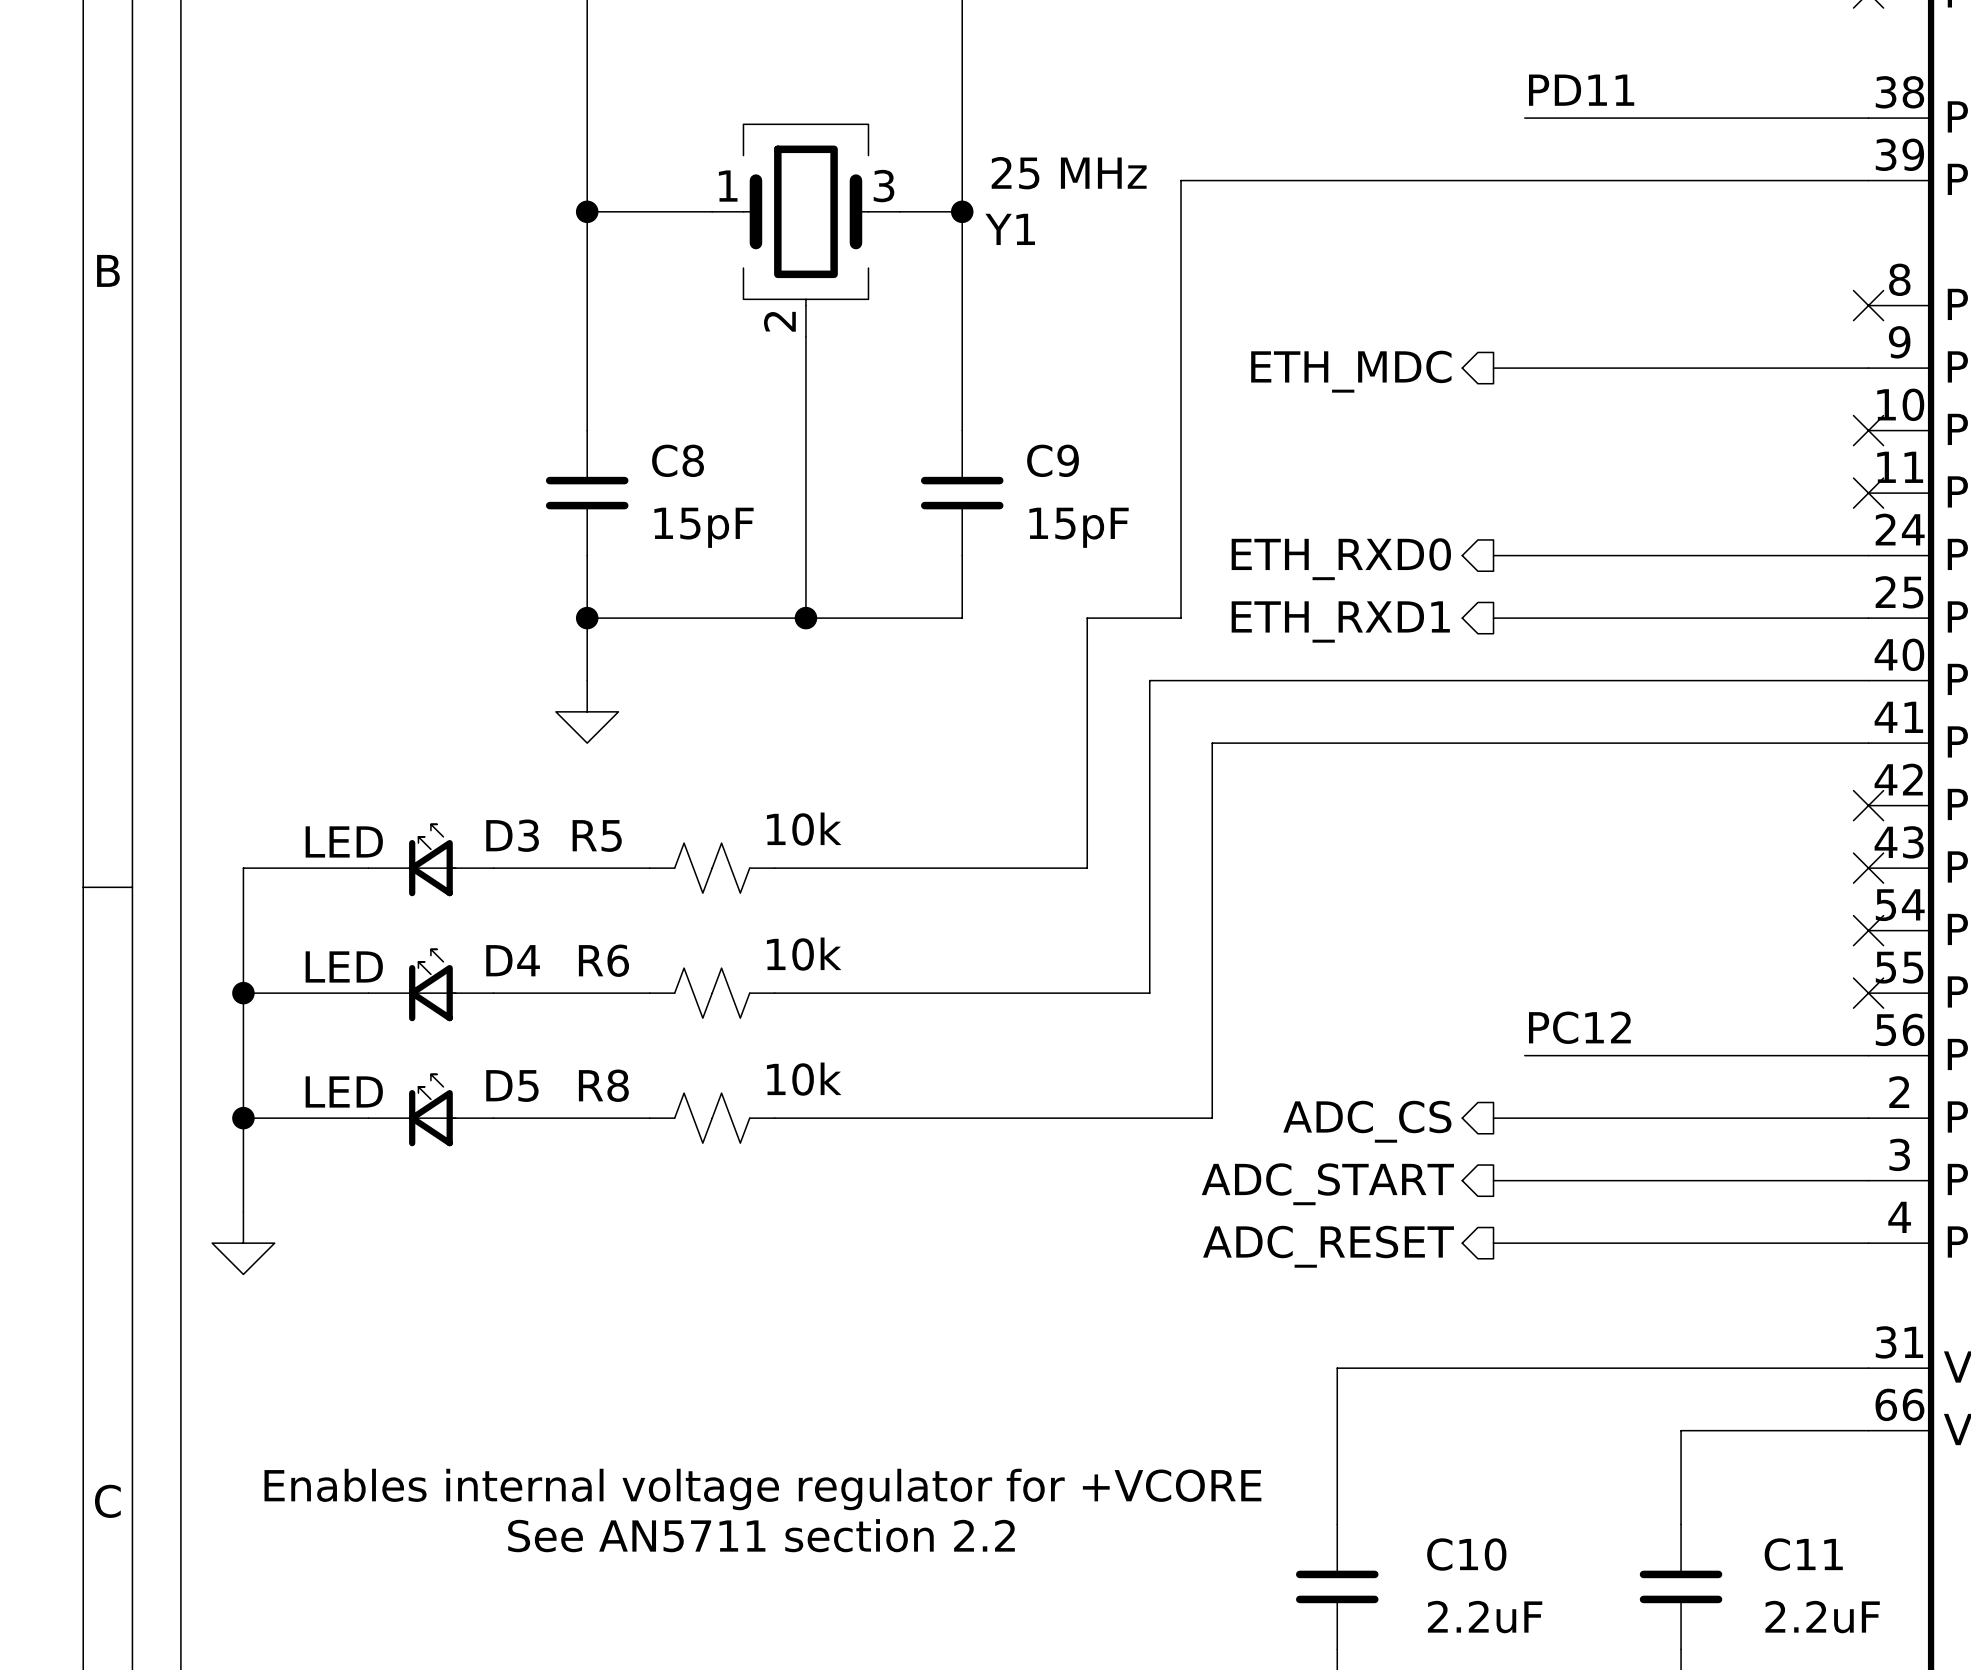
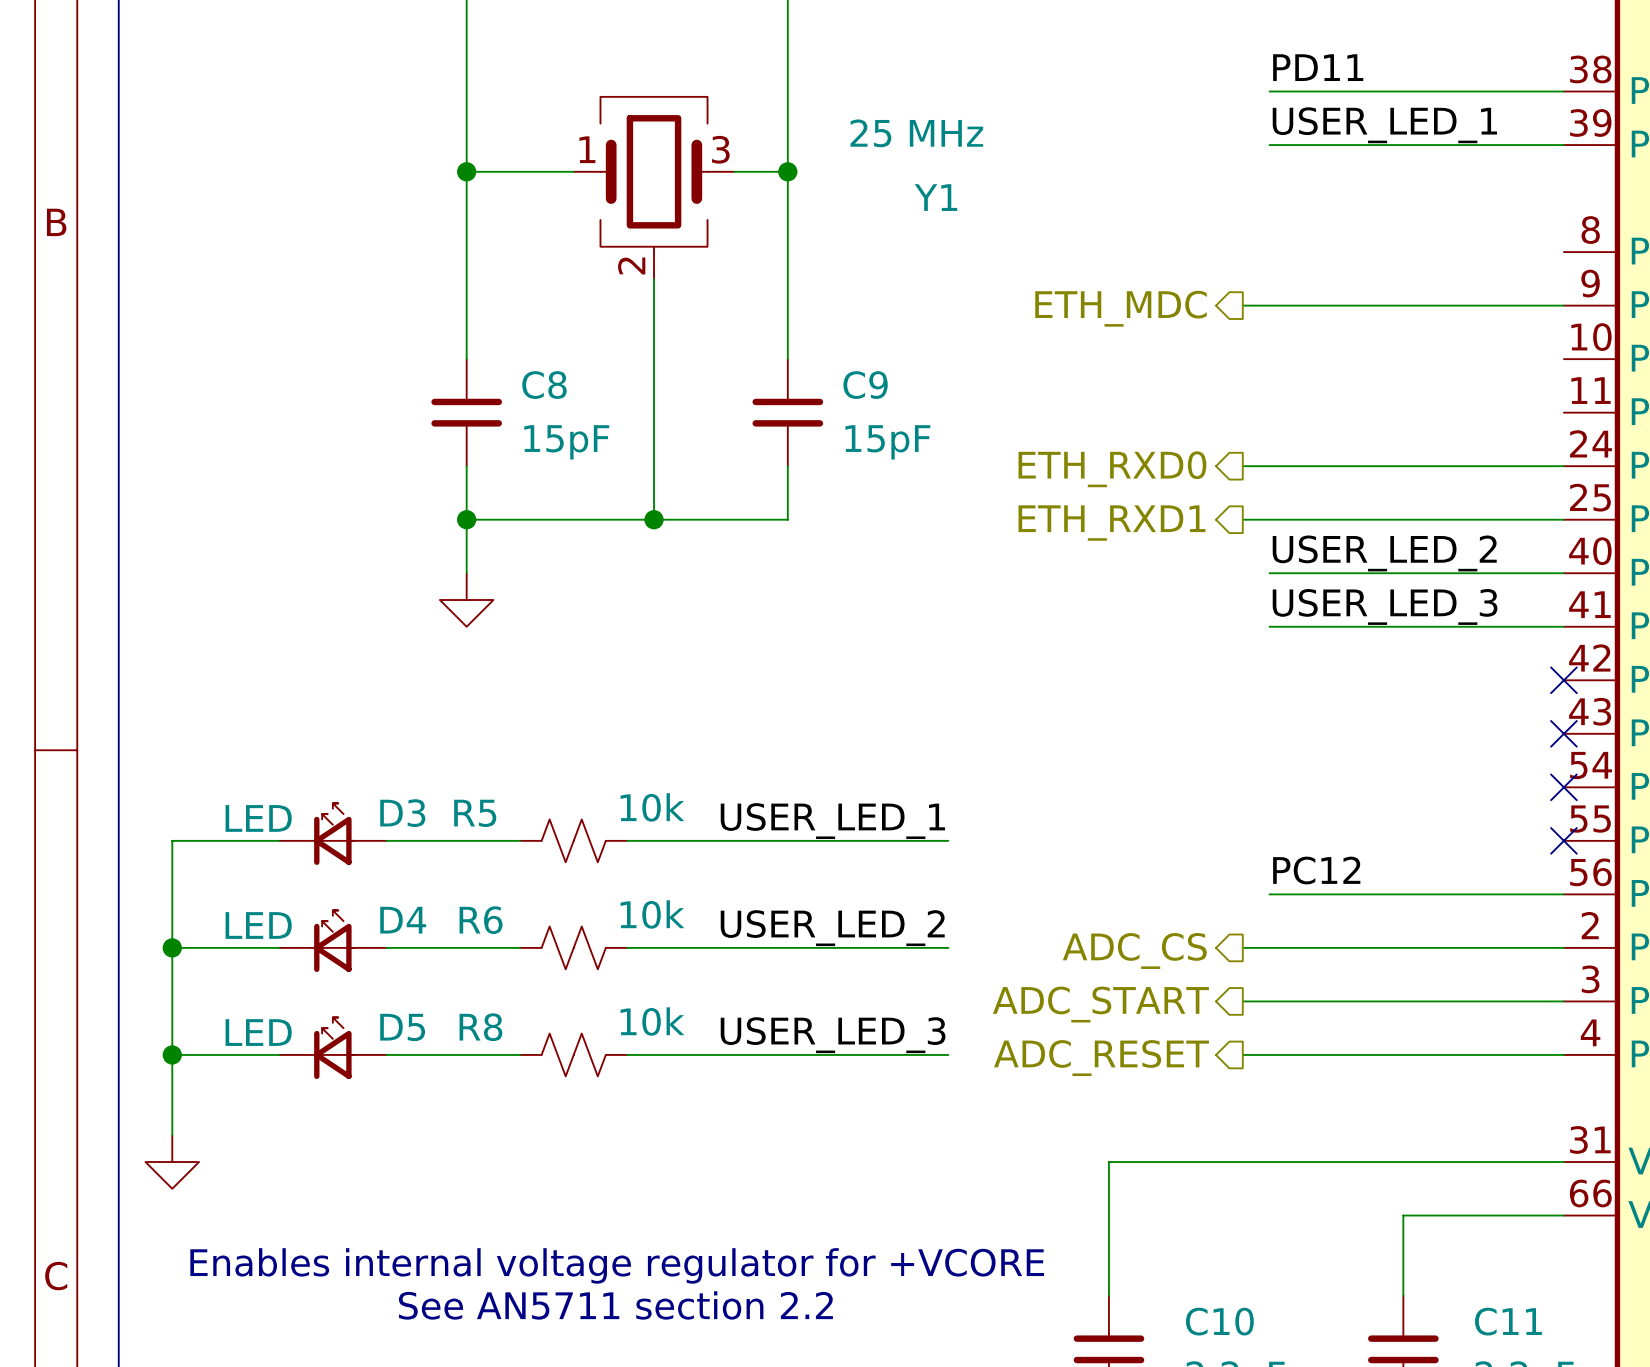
label: none -> USER_LED_1 (1384, 125)
Y1 value position: 25 MHz (1069, 173) -> 25 MHz (916, 133)
wire: (1524, 180) (1181, 180) (1181, 618) (1087, 618) (1087, 868) (774, 868) -> none
Y1 name position: Y1 (1010, 229) -> Y1 (935, 197)
no-connect mark: (1868, 305) -> none
no-connect mark: (1868, 430) -> none
no-connect mark: (1868, 493) -> none
label: none -> USER_LED_2 (1384, 553)
wire: (1524, 680) (1149, 680) (1149, 993) -> none
label: none -> USER_LED_3 (1385, 606)
wire: (1524, 743) (1212, 743) (1212, 1118) (1149, 1118) -> none
D3: LED (430, 860) -> none
wire: (368, 868) (243, 868) (243, 993) -> none
wire: (493, 868) (649, 868) -> (386, 1054) (520, 1054)
R5: 10k (712, 868) -> none
D4 name: D4 (513, 960) -> D3 (402, 813)
R6 name: R6 (603, 960) -> R5 (475, 813)
label: none -> USER_LED_1 (832, 821)
junction: (243, 993) -> none
R8 name: R8 (603, 1085) -> R6 (481, 920)
D5 name: D5 (512, 1086) -> D4 (403, 920)
label: none -> USER_LED_2 (832, 928)
wire: none -> (172, 1028) (172, 1135)
label: none -> USER_LED_3 (833, 1035)
D5: none -> LED (332, 1048)
wire: none -> (172, 1054) (279, 1054)
junction: none -> (172, 1054)
power symbol position: (243, 1243) -> (172, 1162)
R8: none -> 10k (573, 1054)
wire: none -> (627, 1054) (948, 1054)

